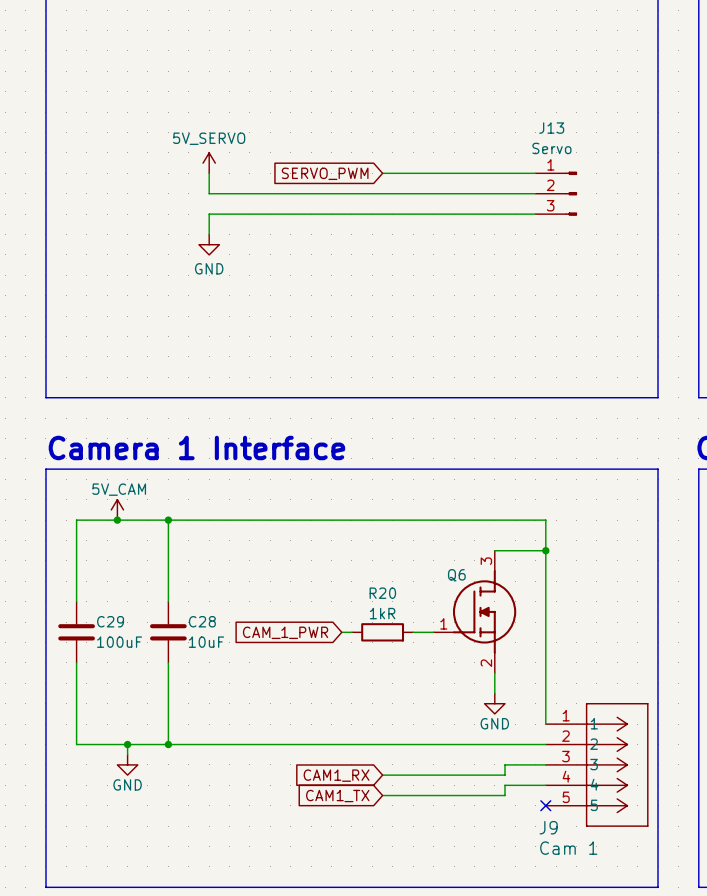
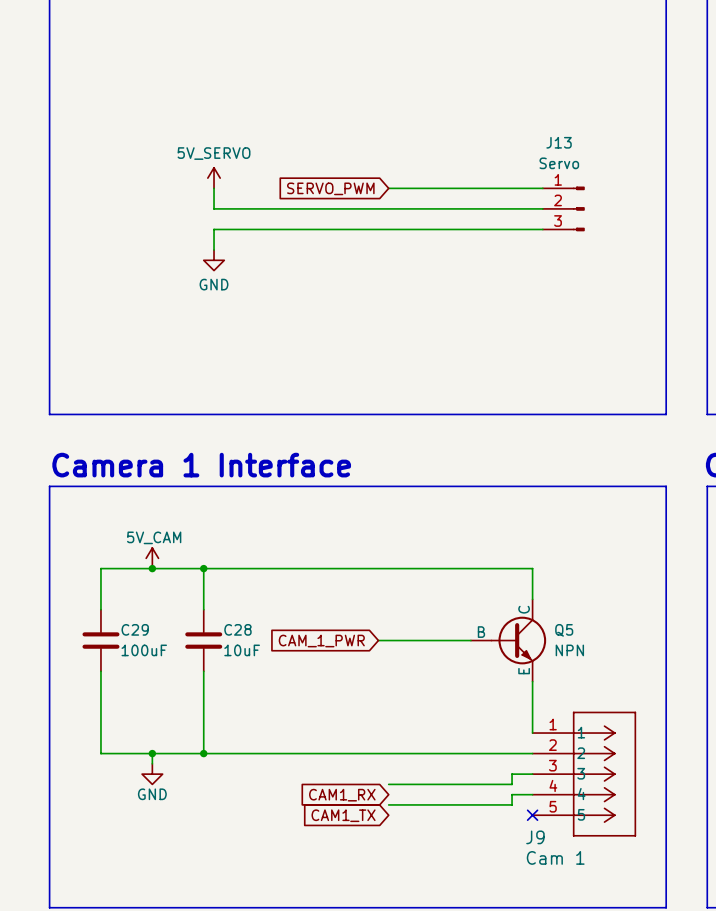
power symbol position: 5V_CAM (117, 509) -> 5V_CAM (152, 558)
junction: (117, 520) -> none
wire: (168, 520) (168, 601) -> none
junction: (168, 520) -> none
junction: none -> (152, 568)
wire: none -> (203, 568) (203, 609)
junction: none -> (203, 568)
wire: none -> (501, 568) (100, 568) (100, 609)
wire: (525, 550) (545, 550) -> (532, 568) (532, 599)
junction: (545, 550) -> none
wire: (76, 601) (76, 520) (545, 520) (545, 724) -> none
Q6: (474, 611) -> none
wire: none -> (378, 640) (470, 640)
Q5: none -> NPN (508, 640)
C29 position: (76, 632) -> (100, 640)
C28 position: (168, 632) -> (203, 640)
global label position: CAM_1_PWR (285, 632) -> CAM_1_PWR (321, 641)
R20: 1kR (382, 632) -> none
wire: (413, 632) (433, 632) -> none
wire: none -> (100, 671) (100, 753) (532, 753)
wire: (76, 662) (76, 744) (545, 744) -> none
wire: (168, 662) (168, 744) -> (203, 671) (203, 753)
wire: none -> (532, 681) (532, 733)
wire: (494, 673) (494, 693) -> none
power symbol: GND (494, 703) -> none
junction: none -> (152, 753)
junction: none -> (203, 753)
wire: (127, 744) (127, 754) -> (152, 753) (152, 763)
junction: (127, 744) -> none
junction: (168, 744) -> none
wire: none -> (532, 774) (512, 774) (512, 784) (388, 784)
power symbol position: GND (127, 764) -> GND (152, 774)
wire: (545, 764) (505, 764) (505, 775) (382, 775) -> none
J9 position: (597, 764) -> (584, 774)
wire: none -> (532, 794) (512, 794) (512, 804) (388, 804)
wire: (545, 785) (505, 785) (505, 795) (382, 795) -> none
no-connect mark position: (545, 805) -> (532, 815)

